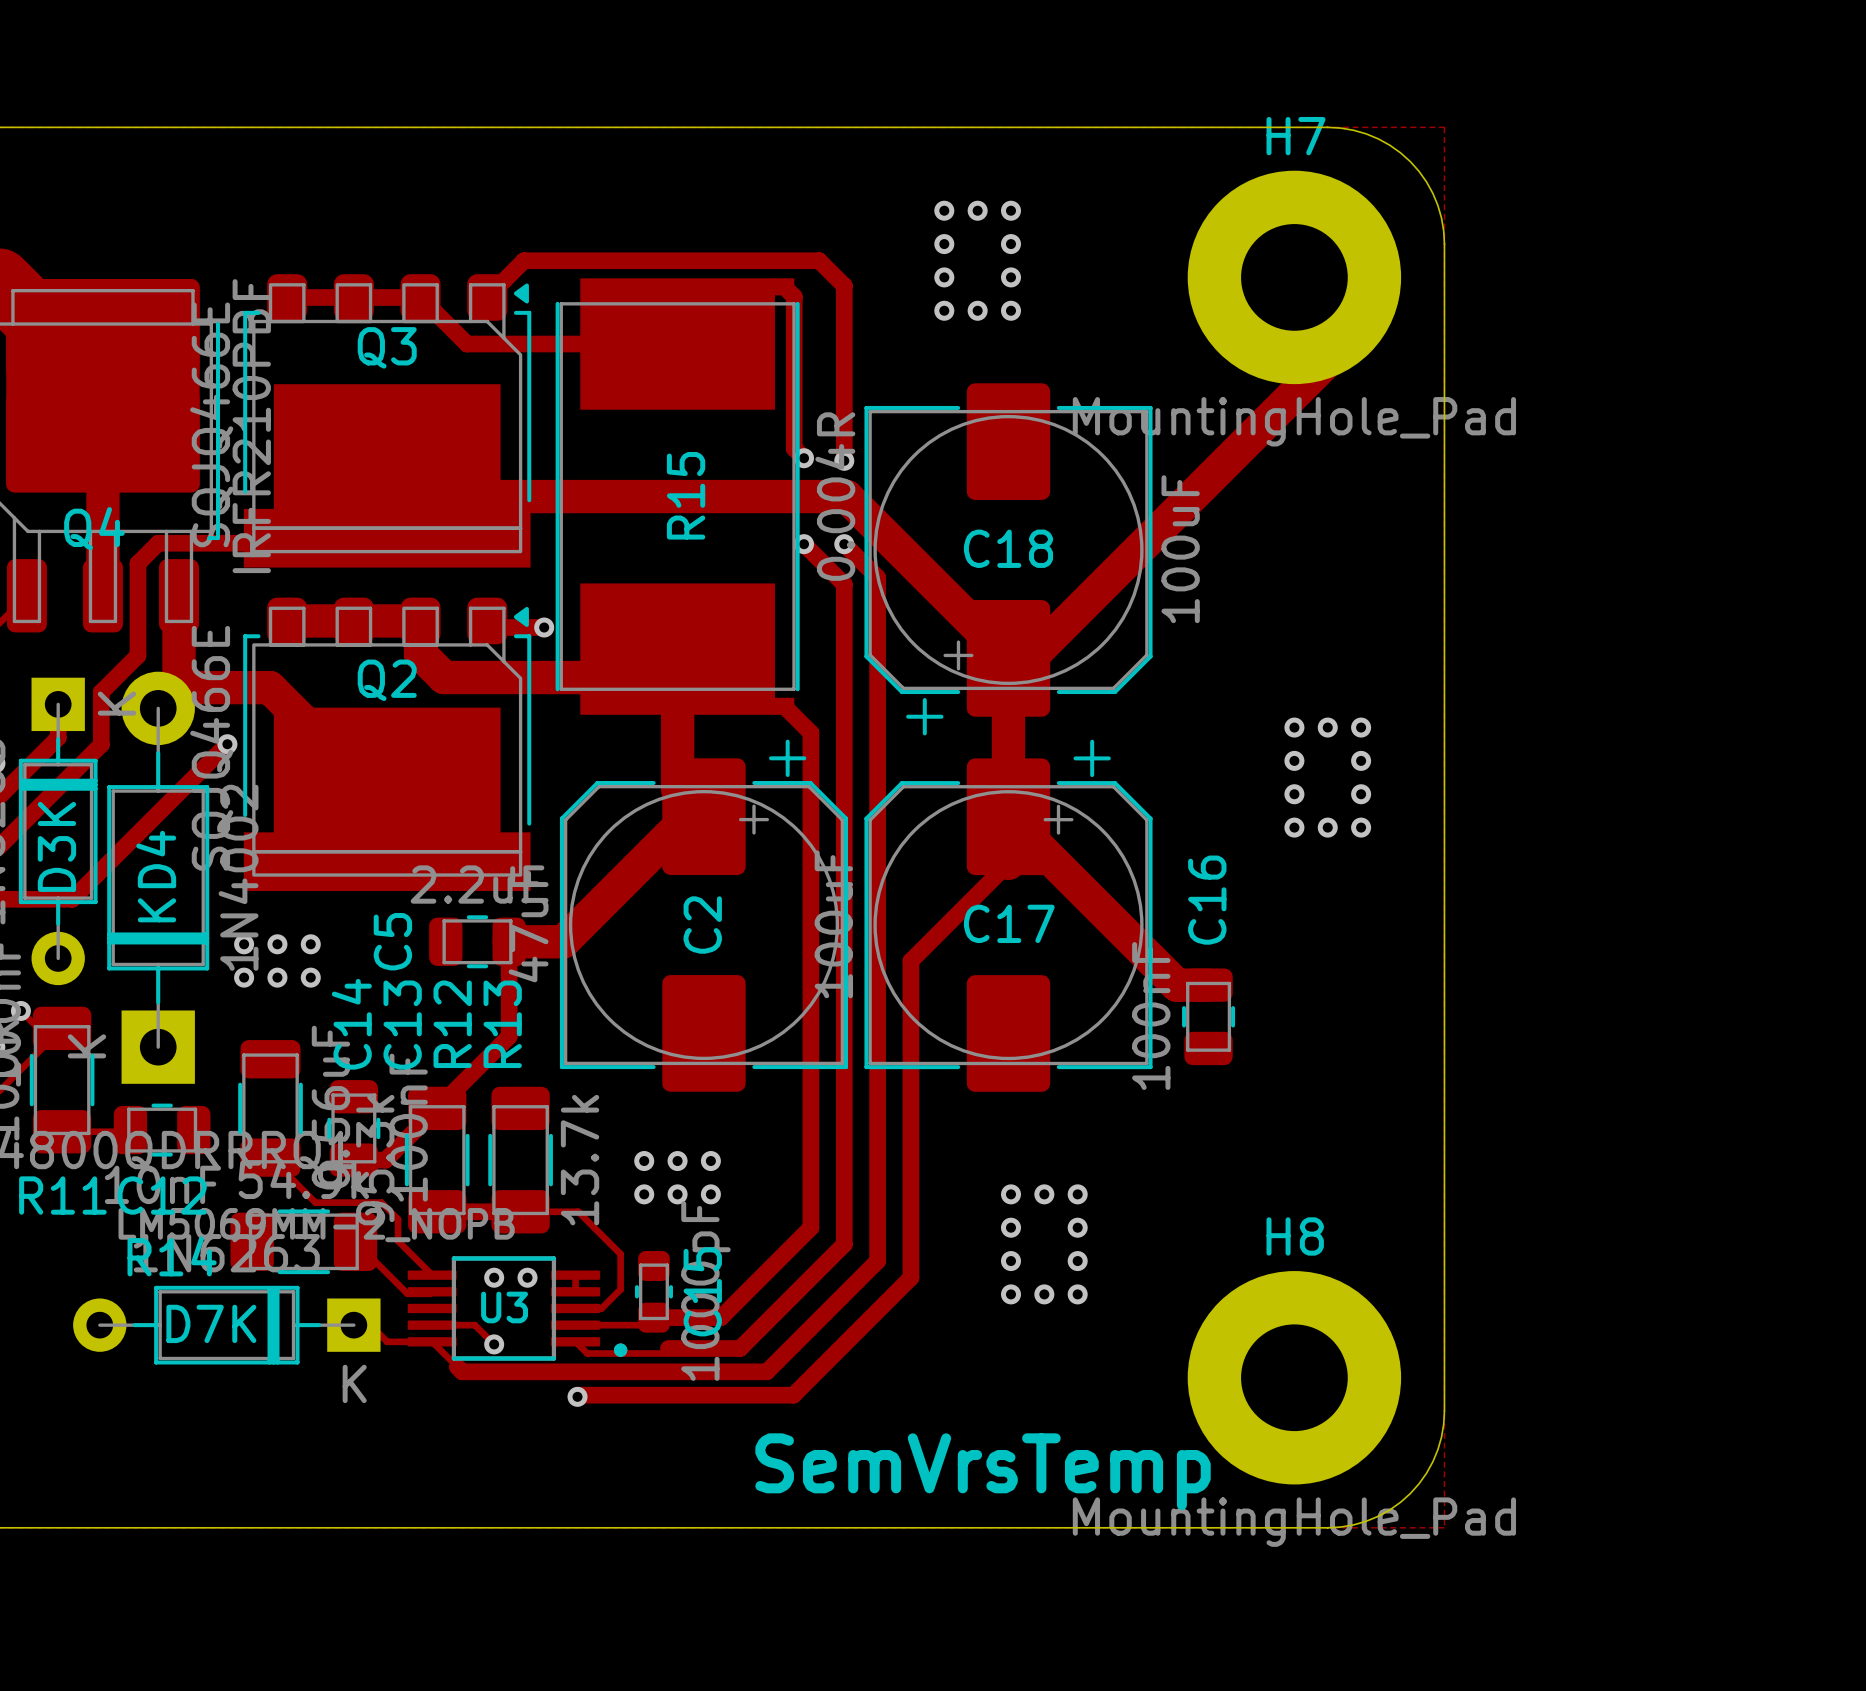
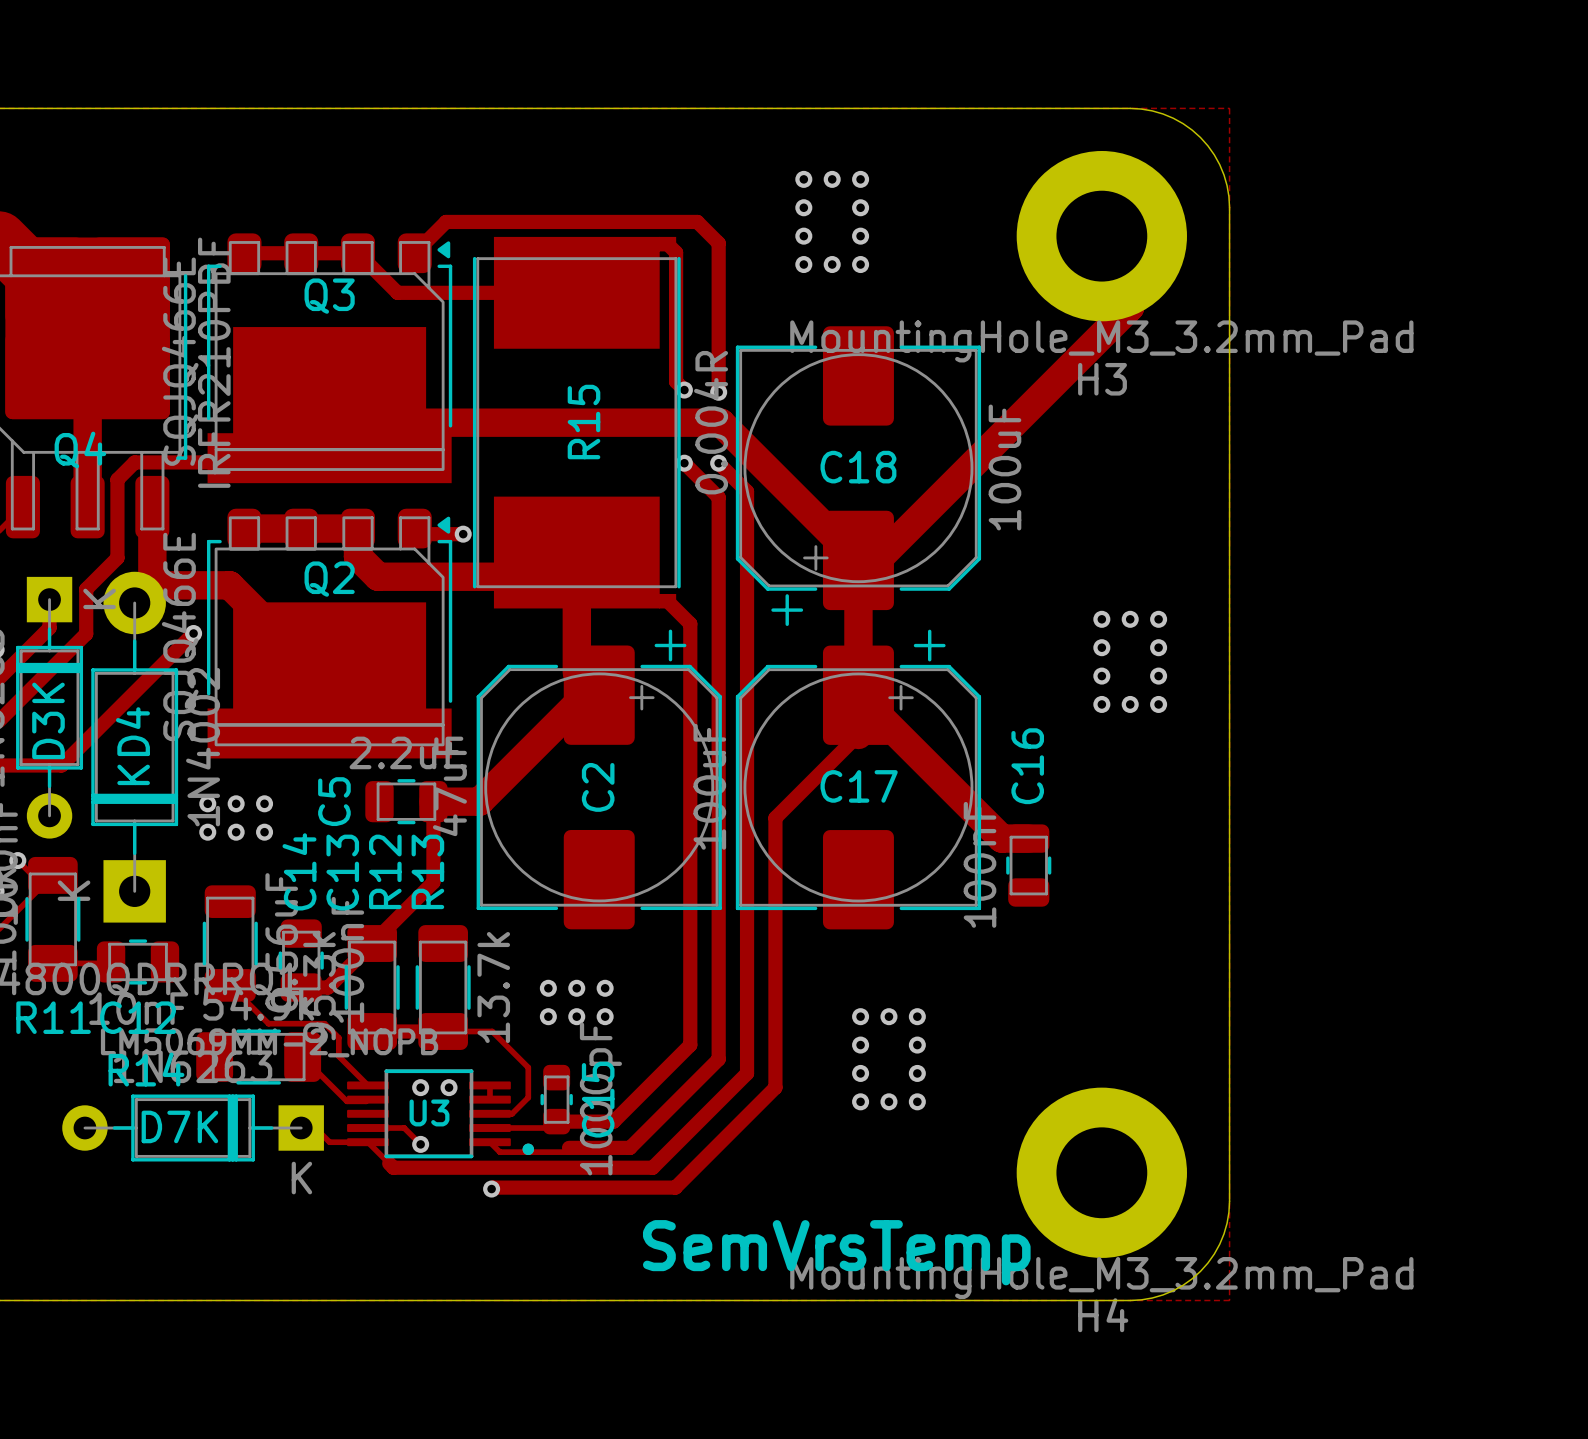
H7: MountingHole_Pad (1294, 277) -> none
H3: none -> MountingHole_M3_3.2mm_Pad (1101, 236)
H8: MountingHole_Pad (1294, 1377) -> none
H4: none -> MountingHole_M3_3.2mm_Pad (1101, 1172)

